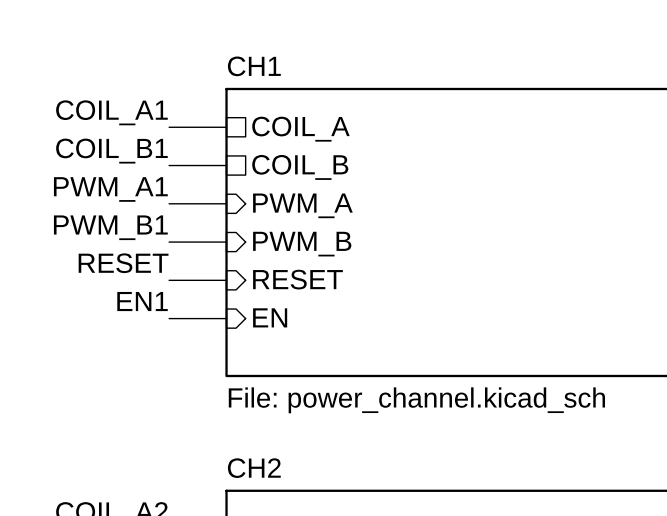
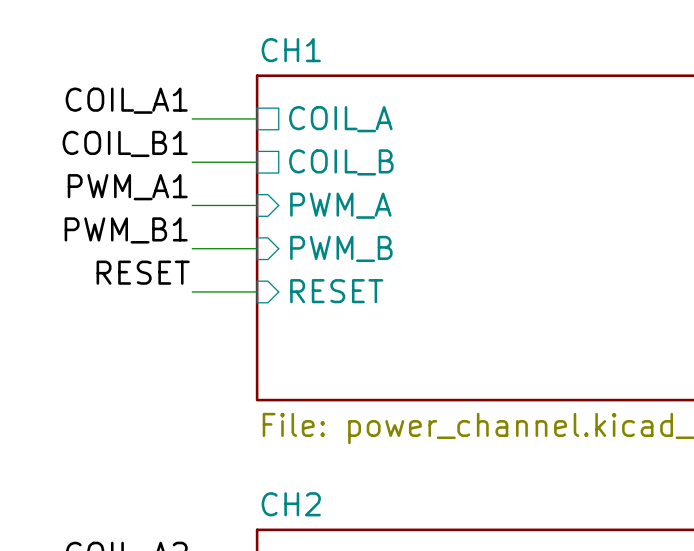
label: EN1 (142, 301) -> none
sheet pin: EN (270, 317) -> none
wire: (169, 318) (226, 318) -> none

